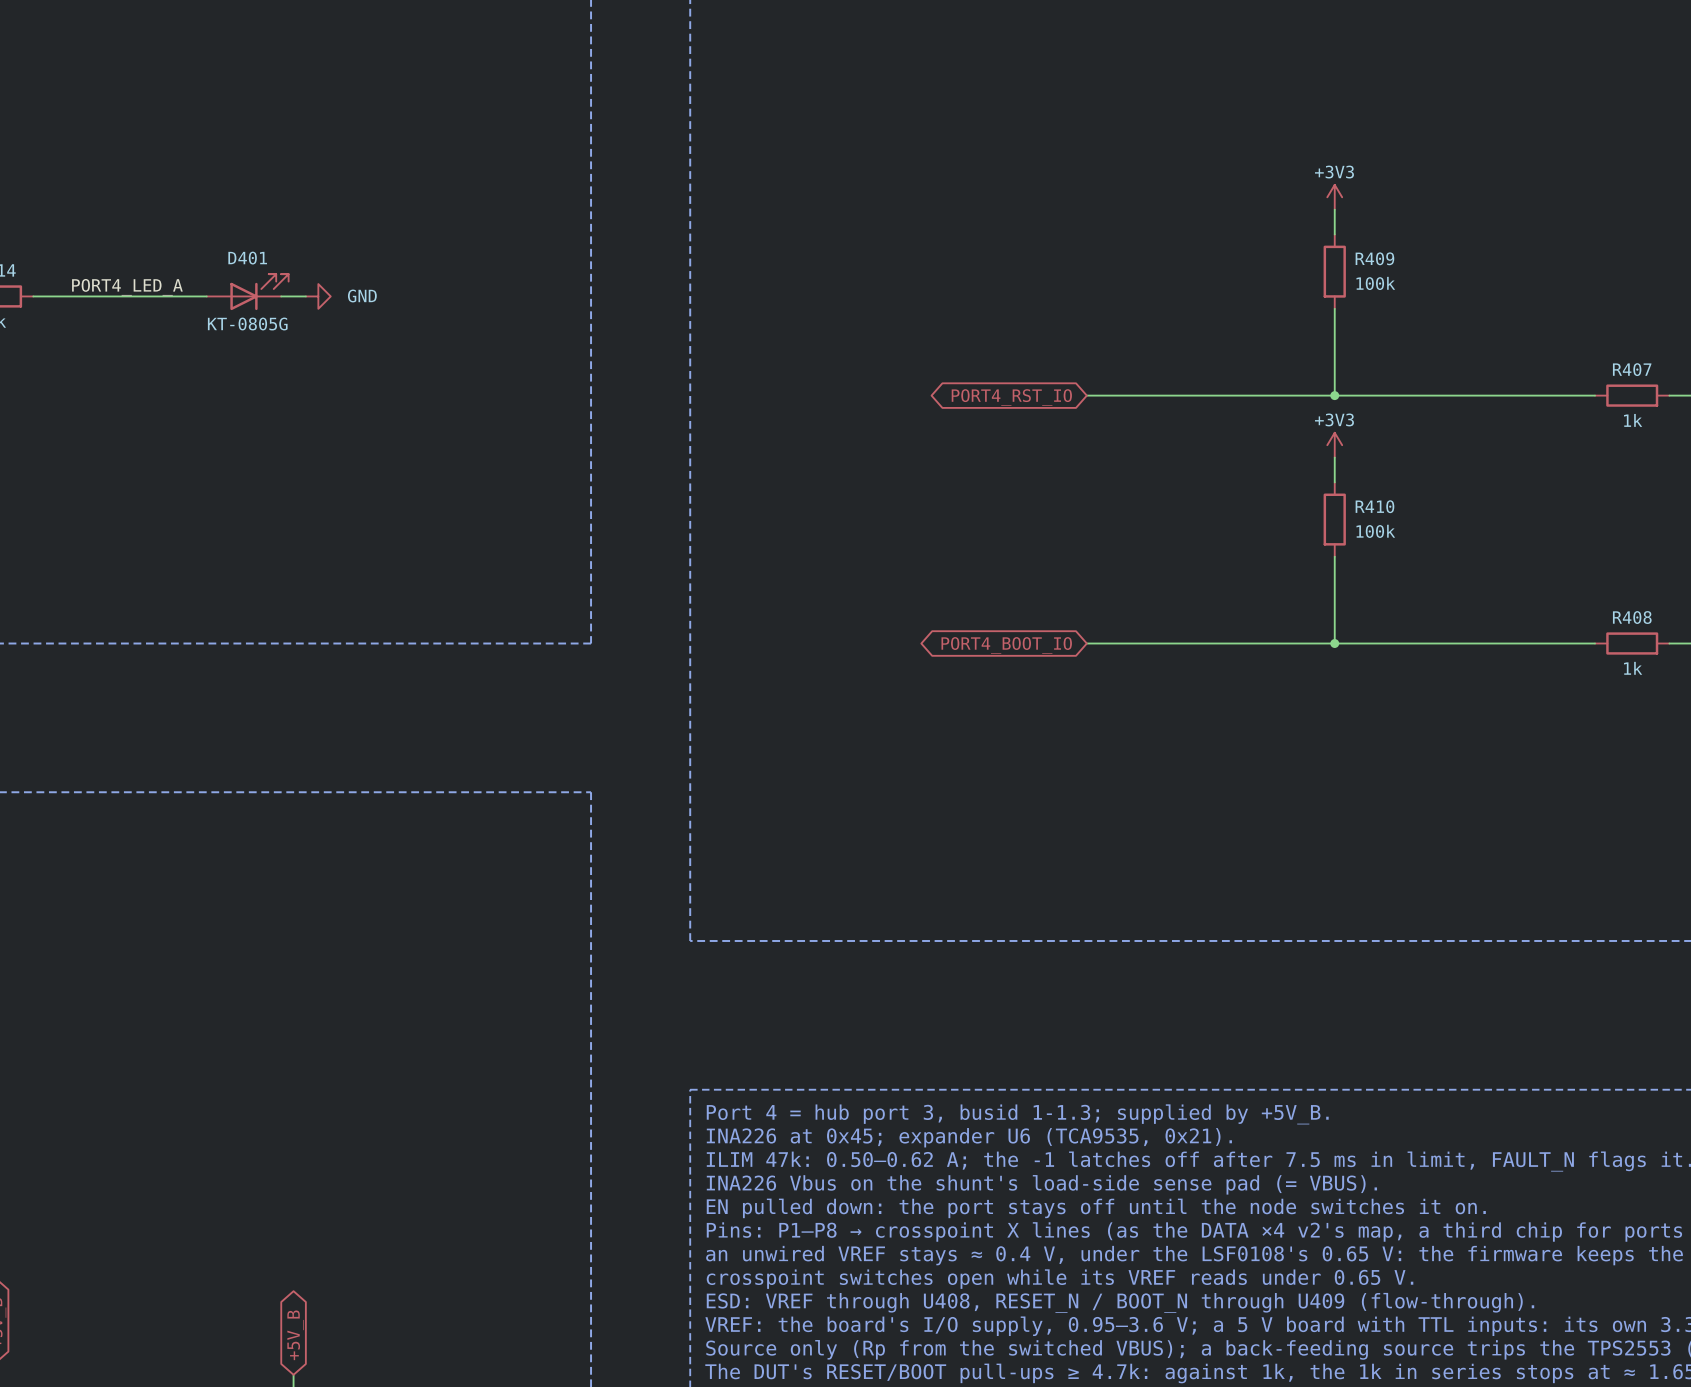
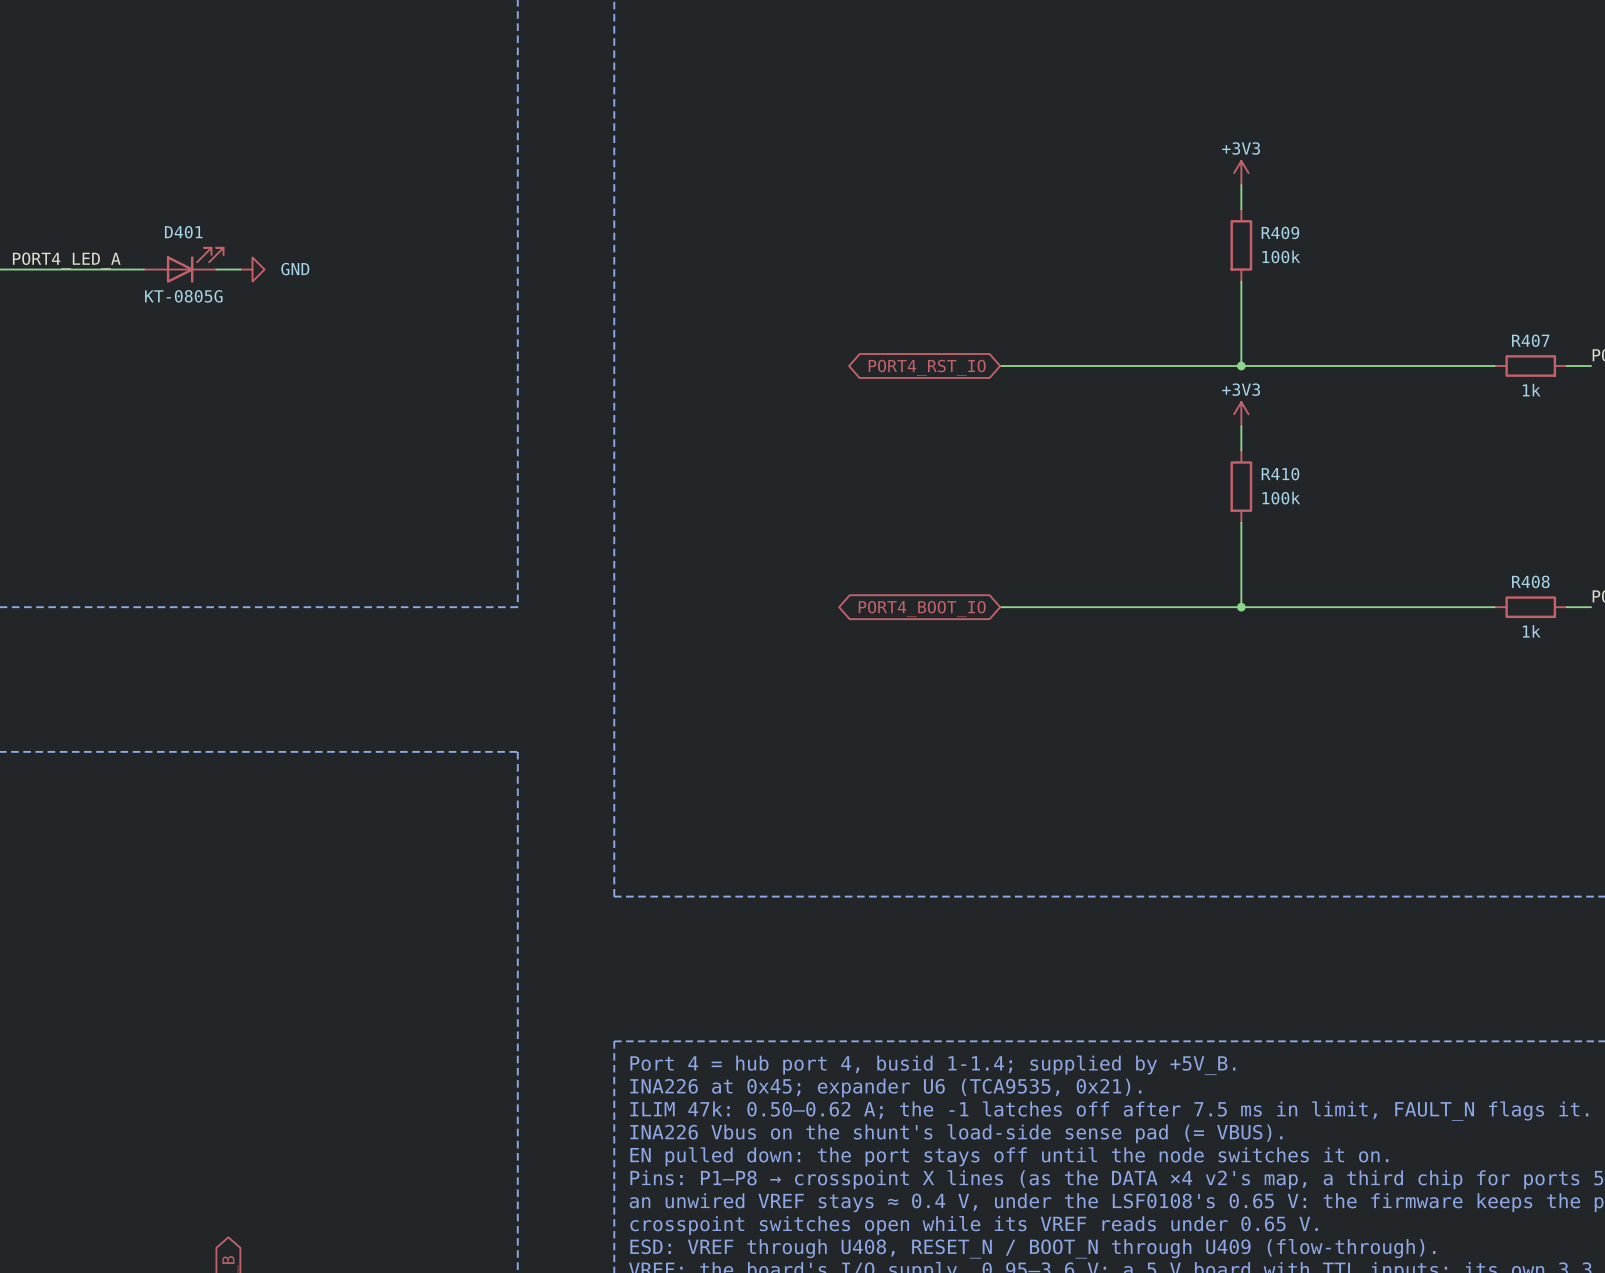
text: Port 4 = hub port 3, busid 1-1.3; supplied by +5V_B. (1017, 1114) -> Port 4 = hub port 4, busid 1-1.4; supplied by +5V_B. (932, 1065)

